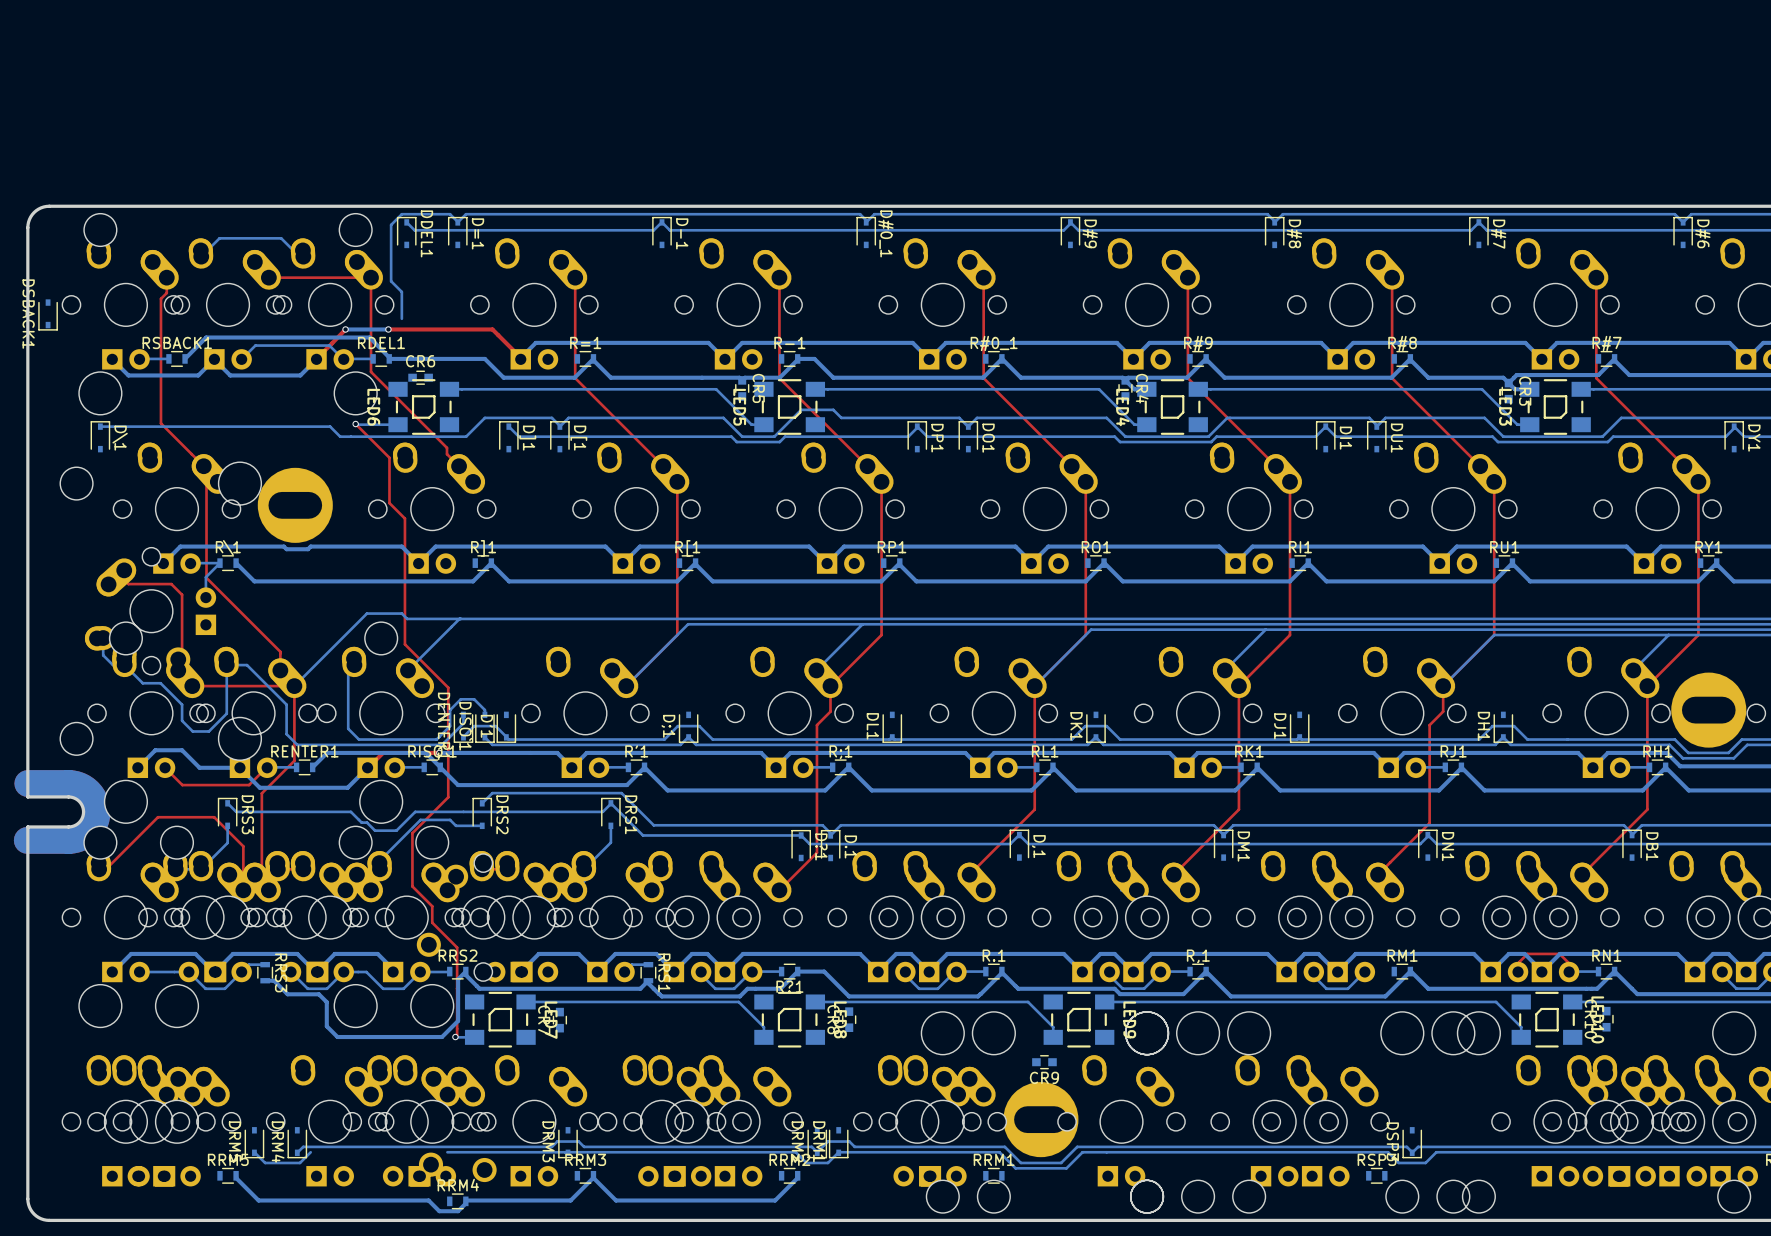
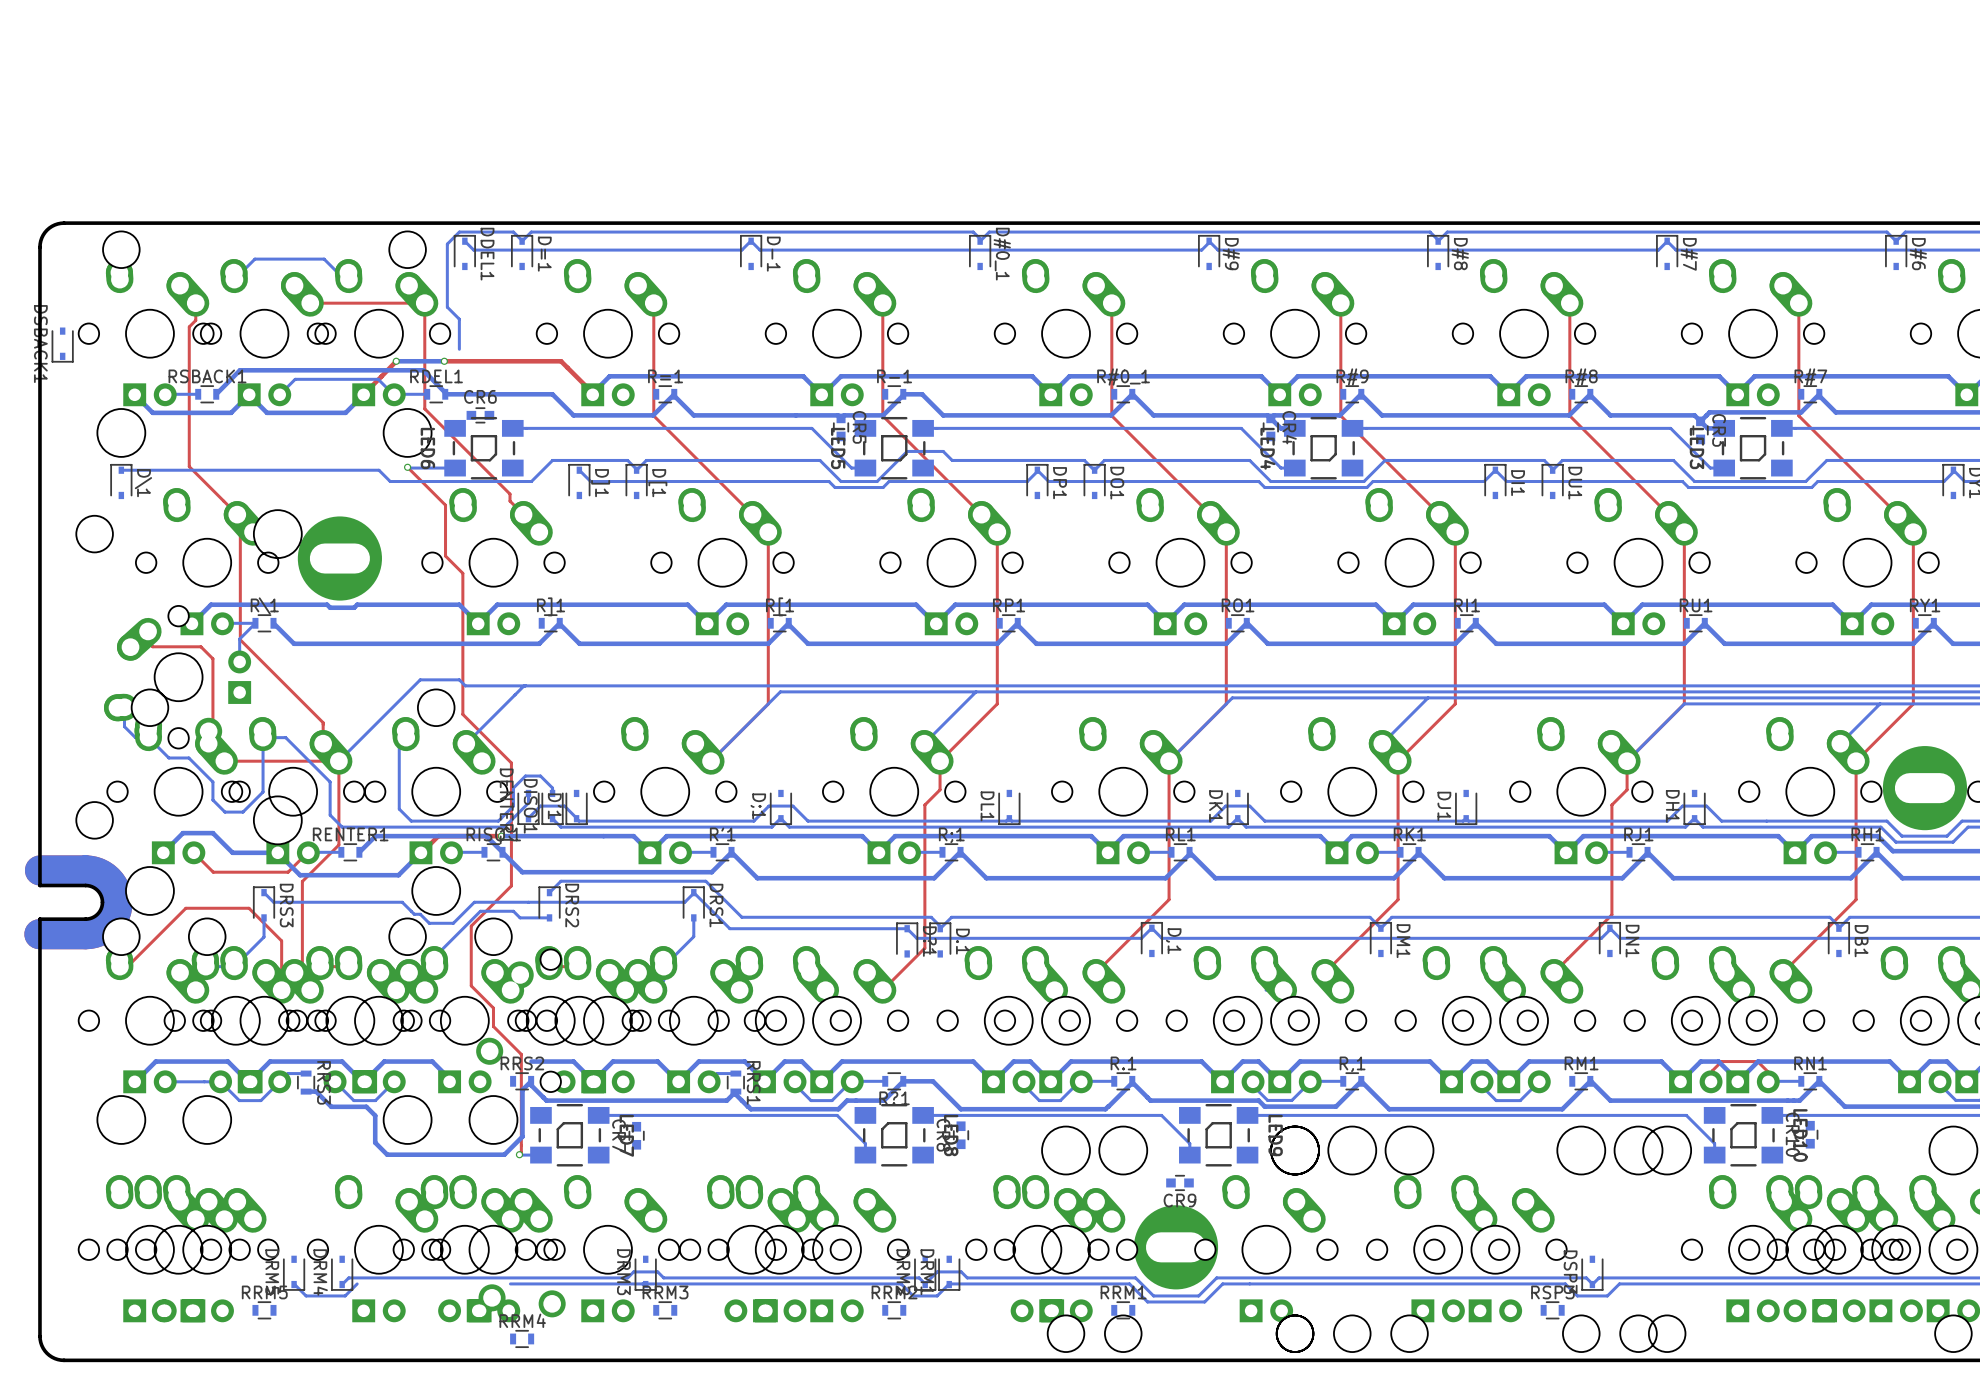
bottom track: none -> (531, 1061) (573, 1061) (592, 1080)
bottom track: (449, 971) (420, 972) (403, 988) (383, 988) (366, 972) (343, 972) -> none
bottom track: (236, 1175) (258, 1200) (428, 1200) (439, 1211) (458, 1211) (466, 1200) (570, 1200) (593, 1177) -> none
bottom track: (797, 1175) (775, 1200) (616, 1200) (593, 1175) -> none

